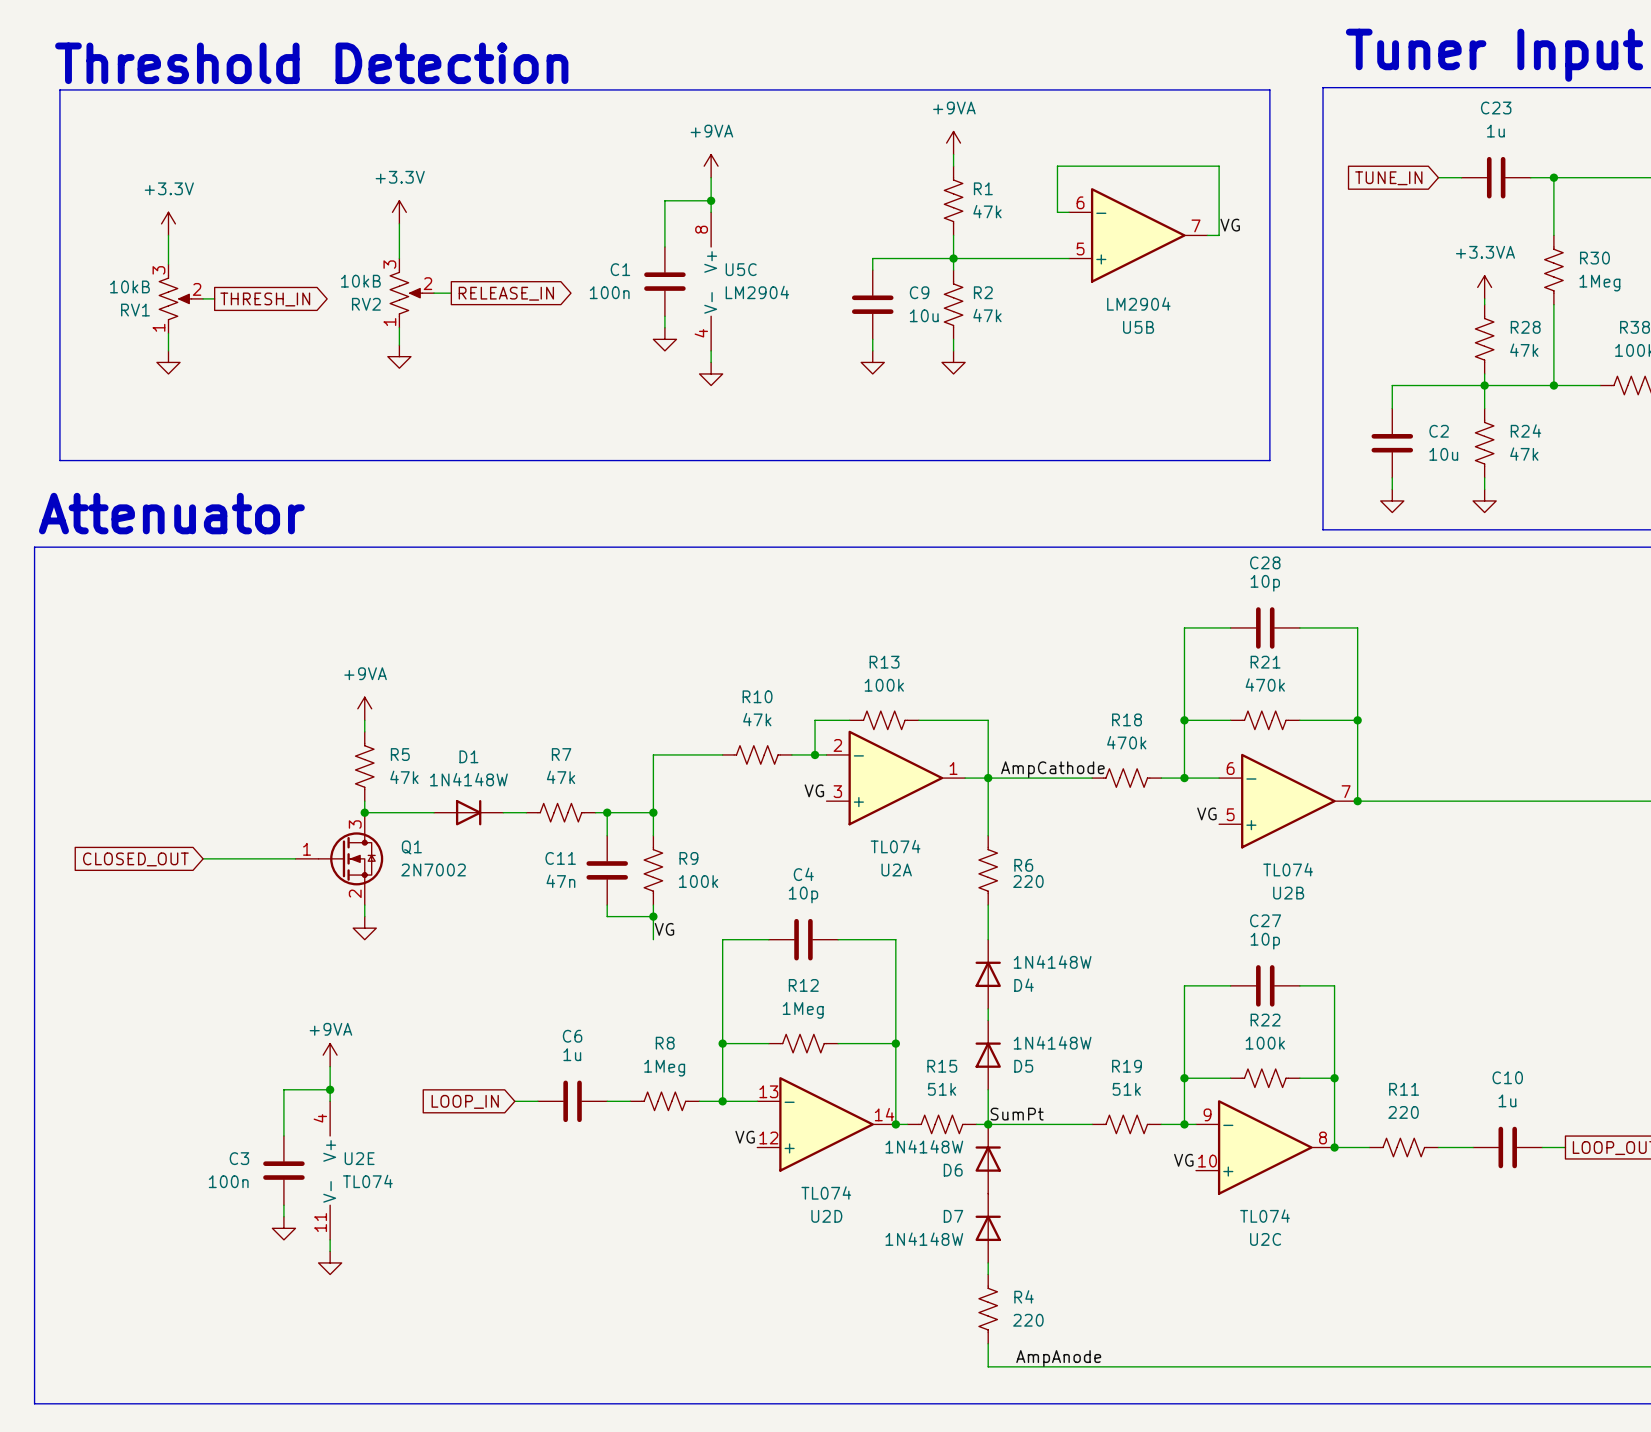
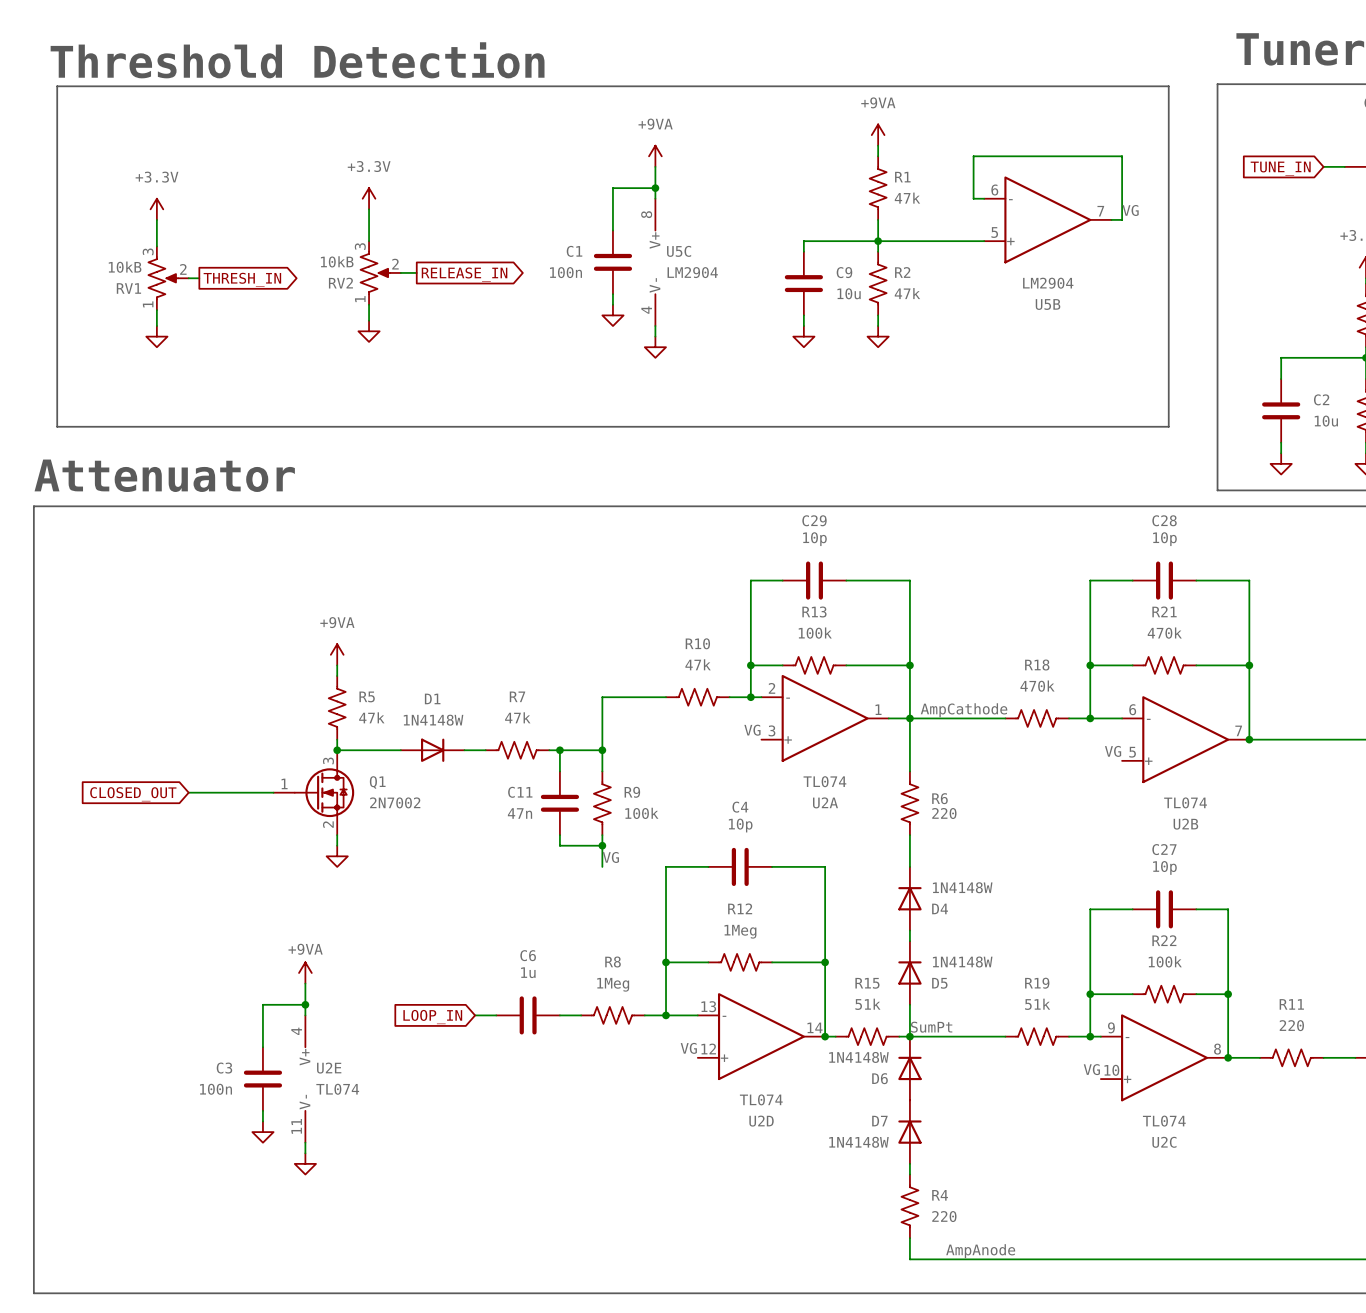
wire: none -> (782, 580) (750, 580) (750, 665)
C29: none -> 10p (814, 580)
wire: none -> (846, 580) (909, 580) (909, 665)
junction: none -> (750, 665)
junction: none -> (909, 665)

